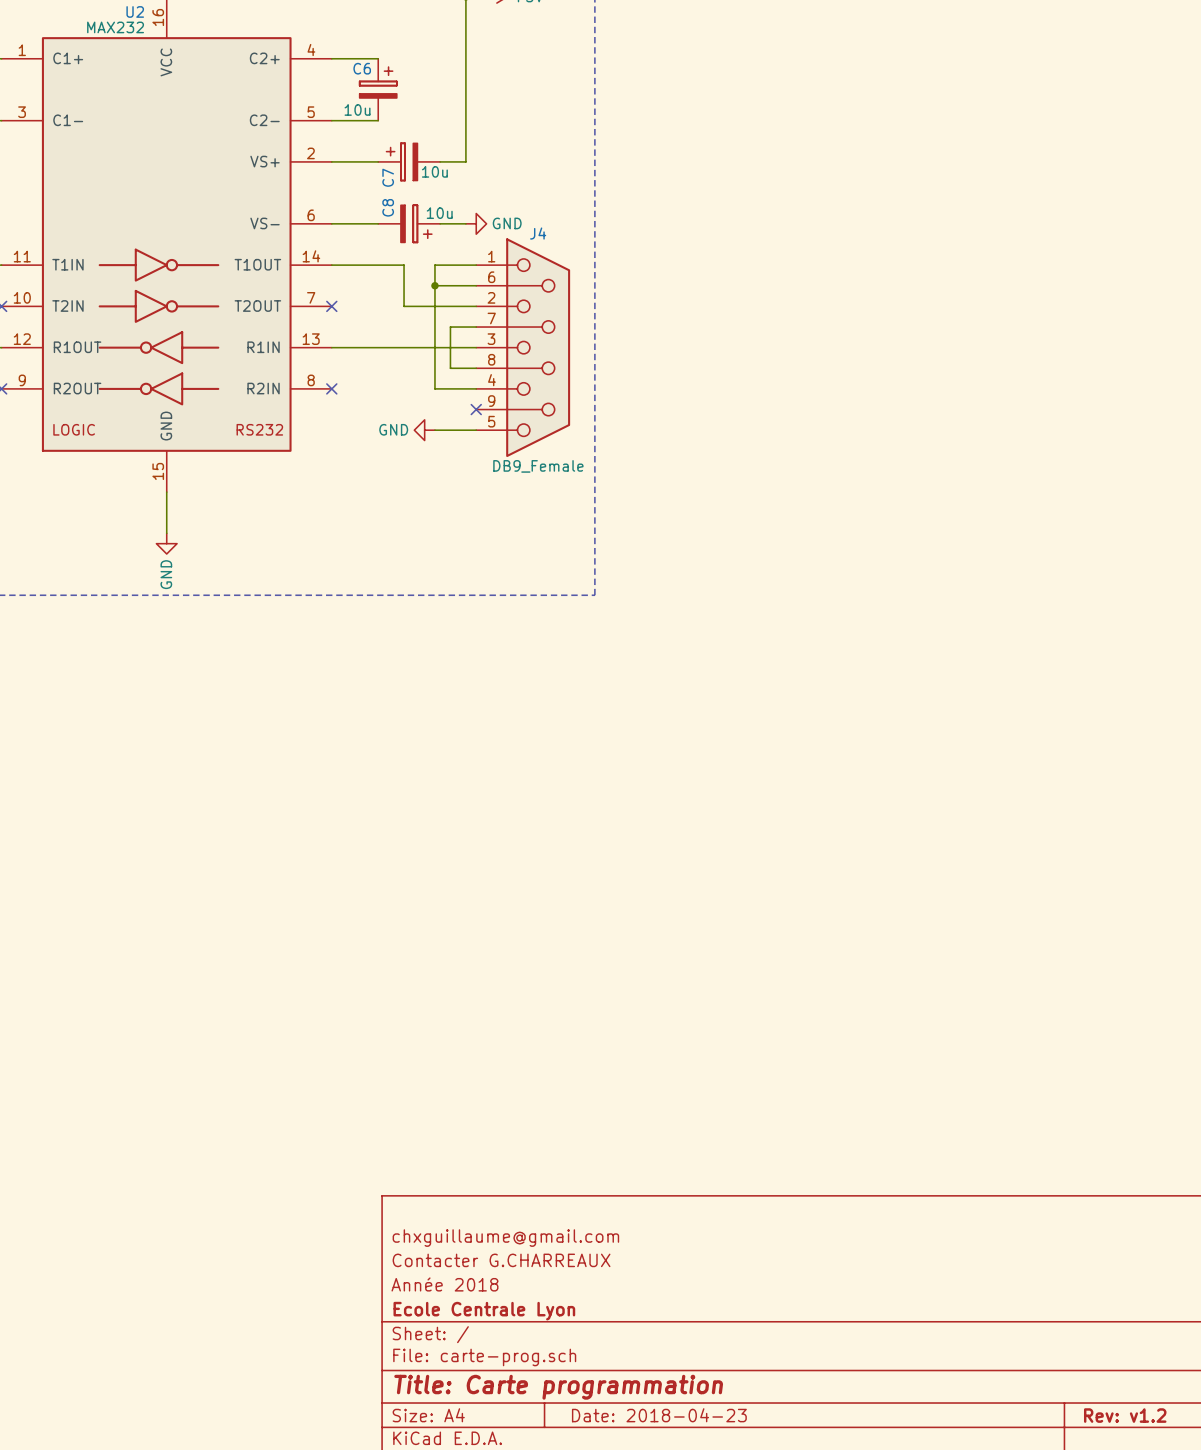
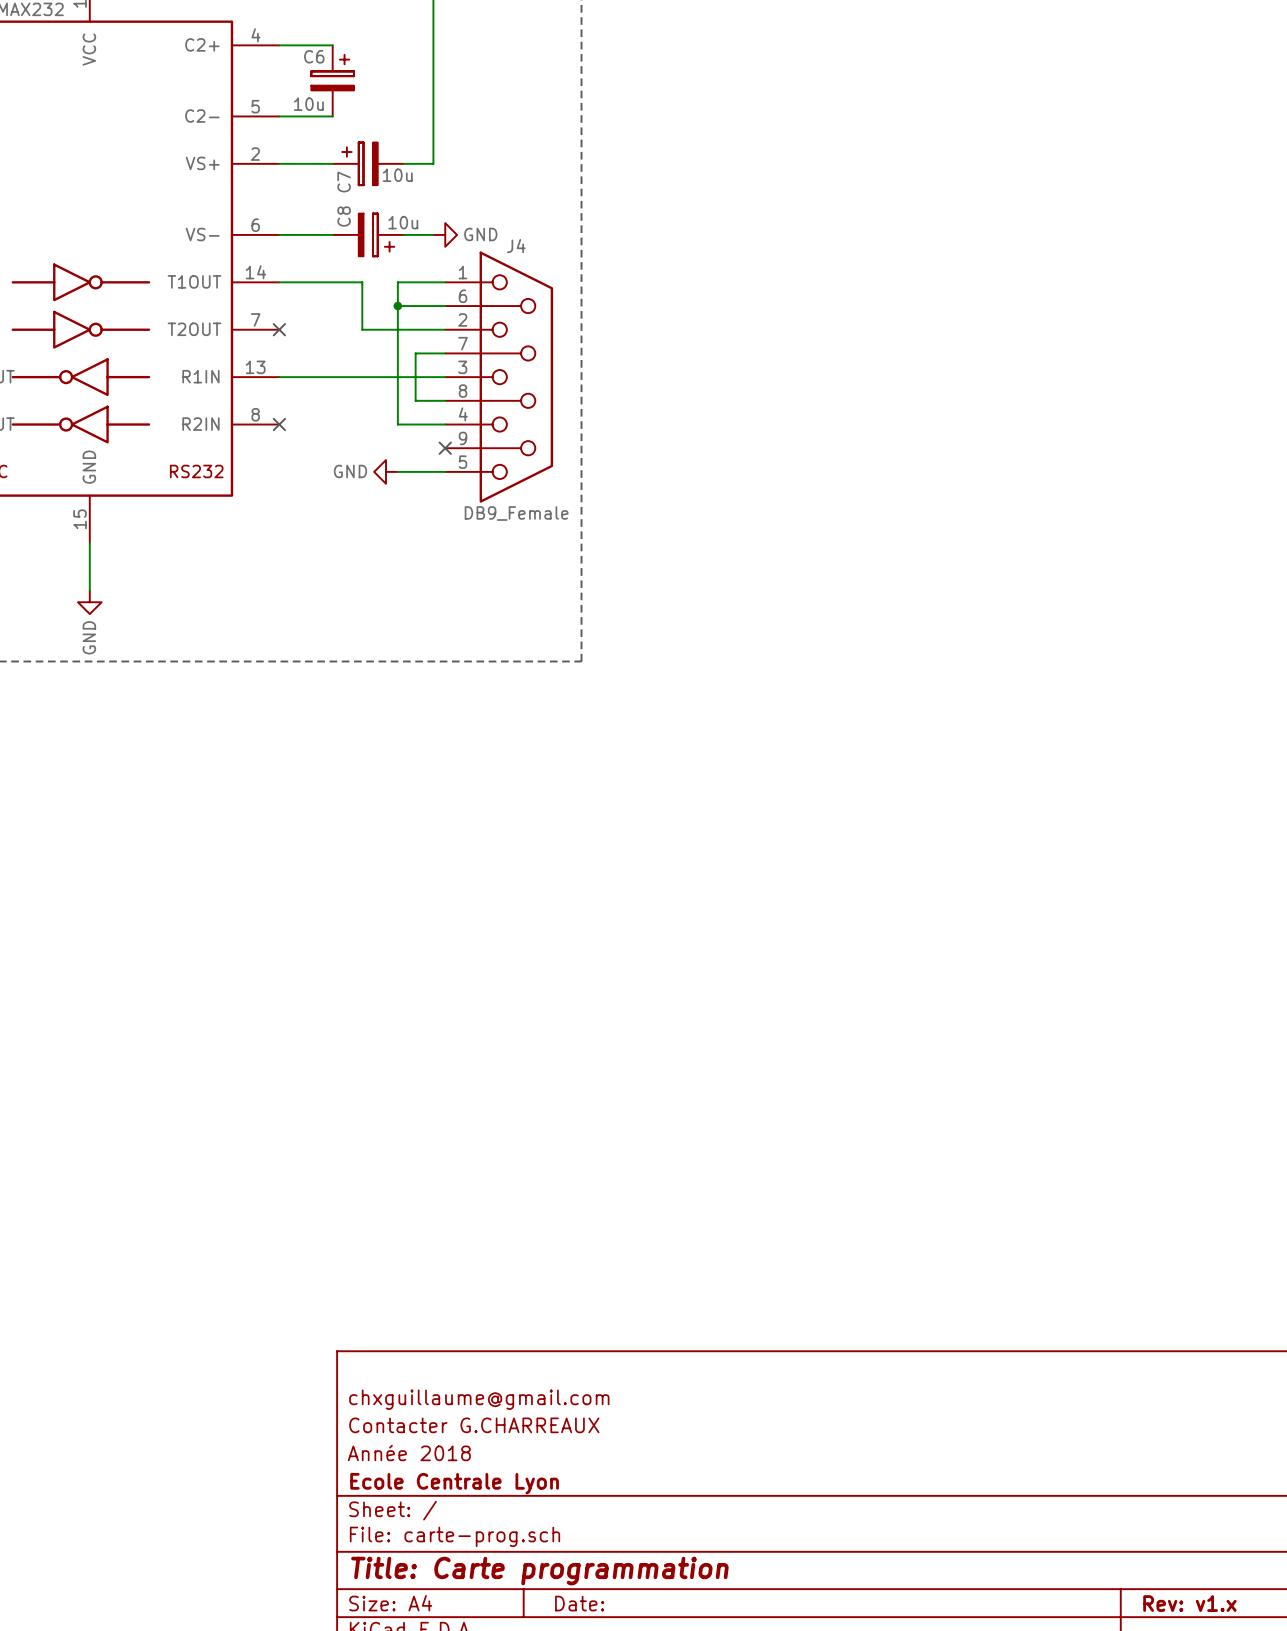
title block: Date: 2018-04-23 (659, 1415) -> Date: (579, 1603)
title block: Rev: v1.2 (1125, 1415) -> Rev: v1.x (1189, 1603)

